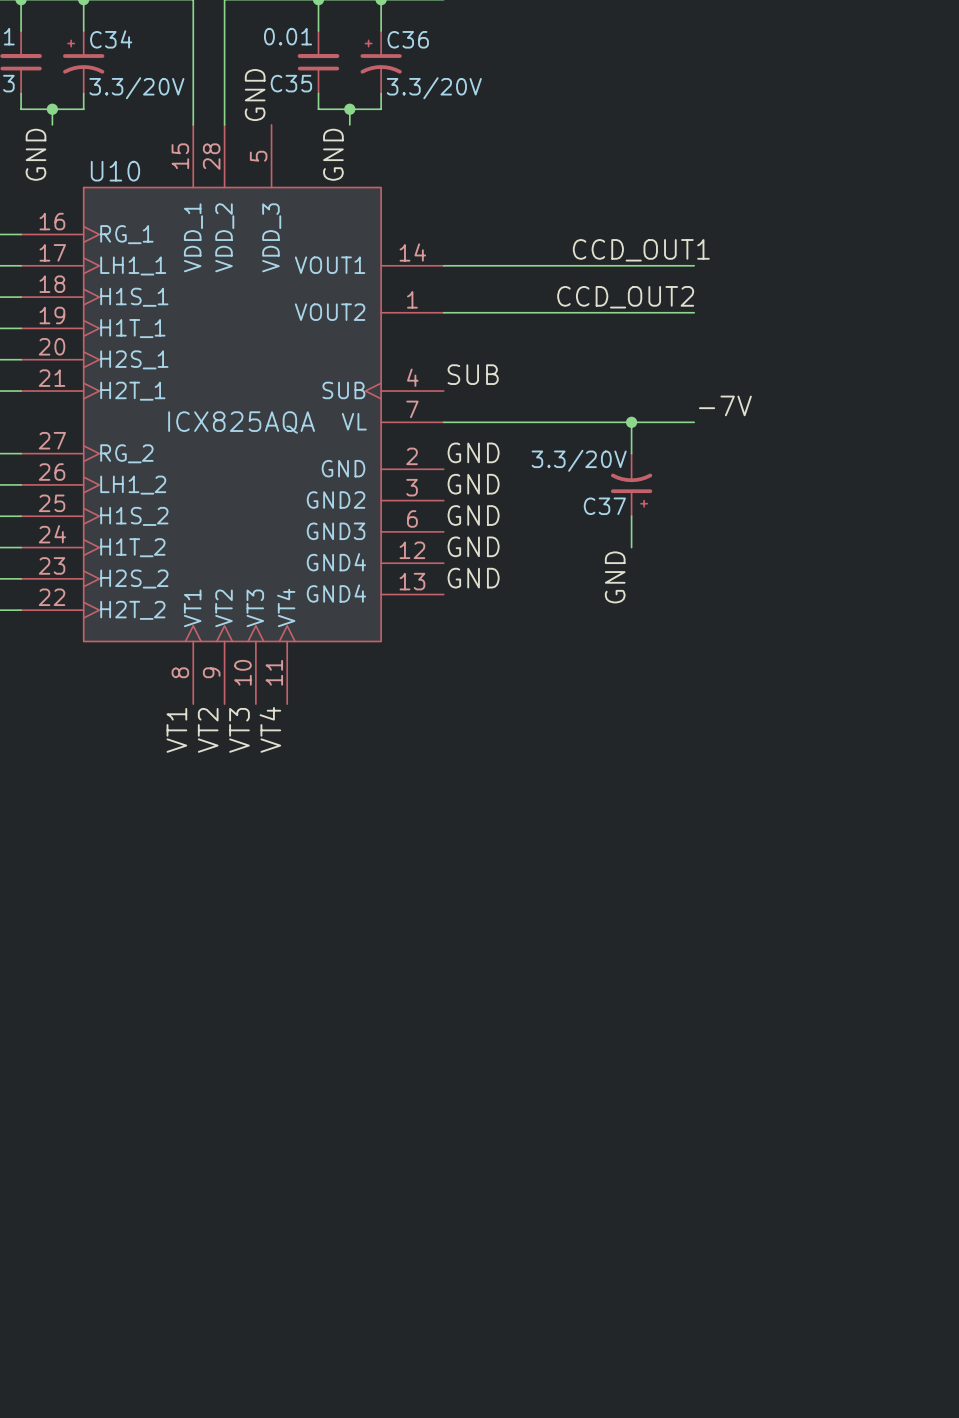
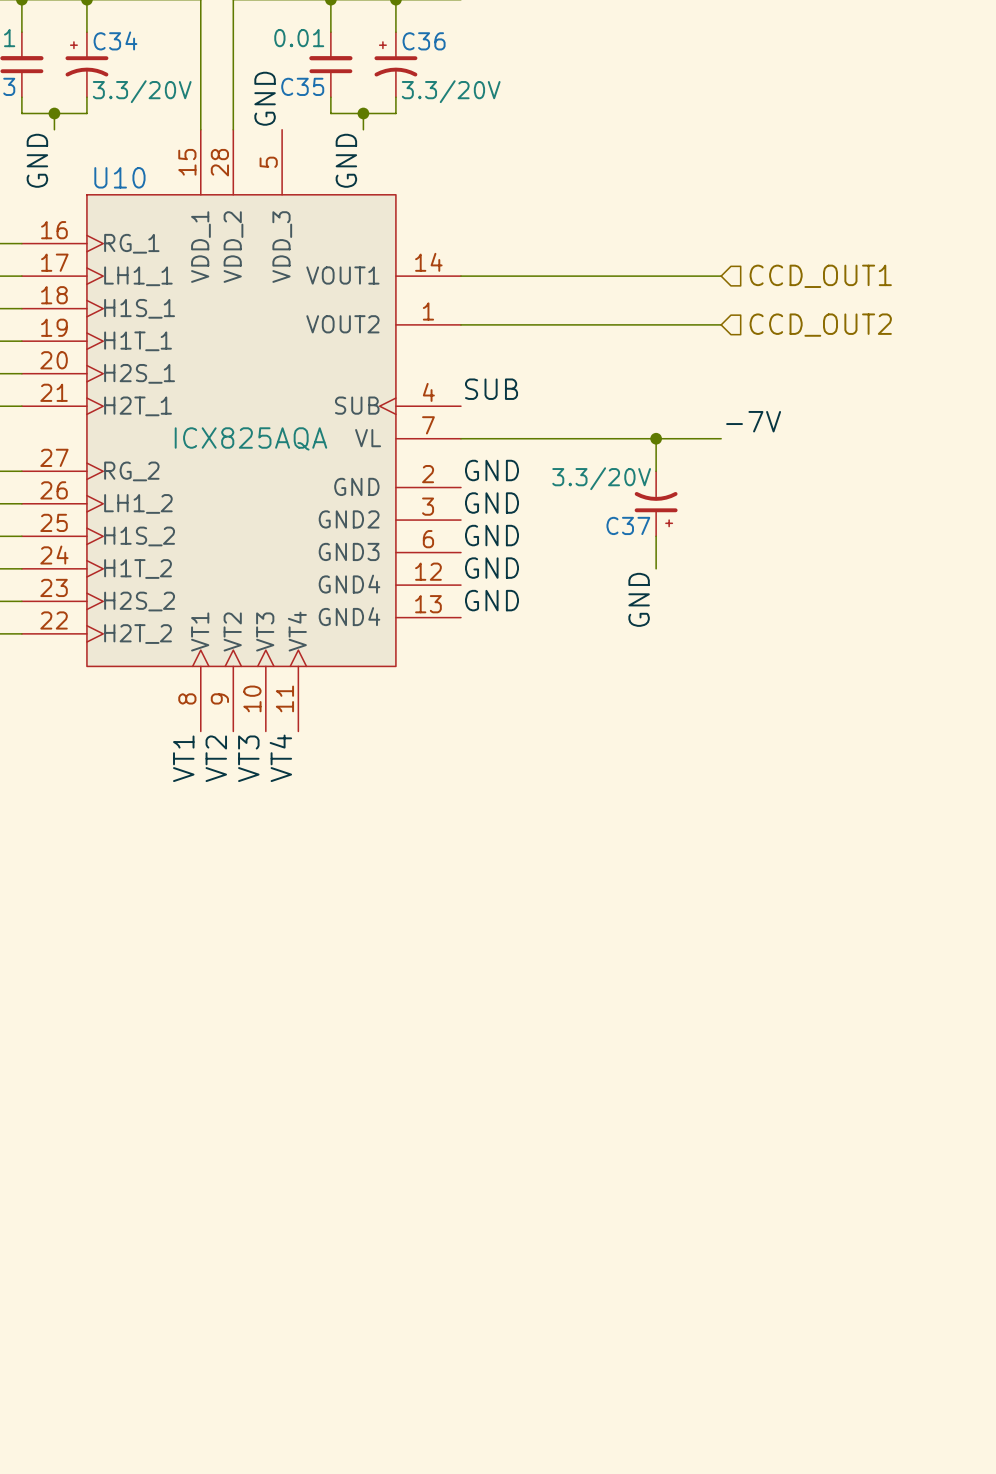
label: CCD_OUT1 (641, 250) -> none
hierarchical label: none -> CCD_OUT1 (820, 276)
label: CCD_OUT2 (625, 297) -> none
hierarchical label: none -> CCD_OUT2 (820, 325)

